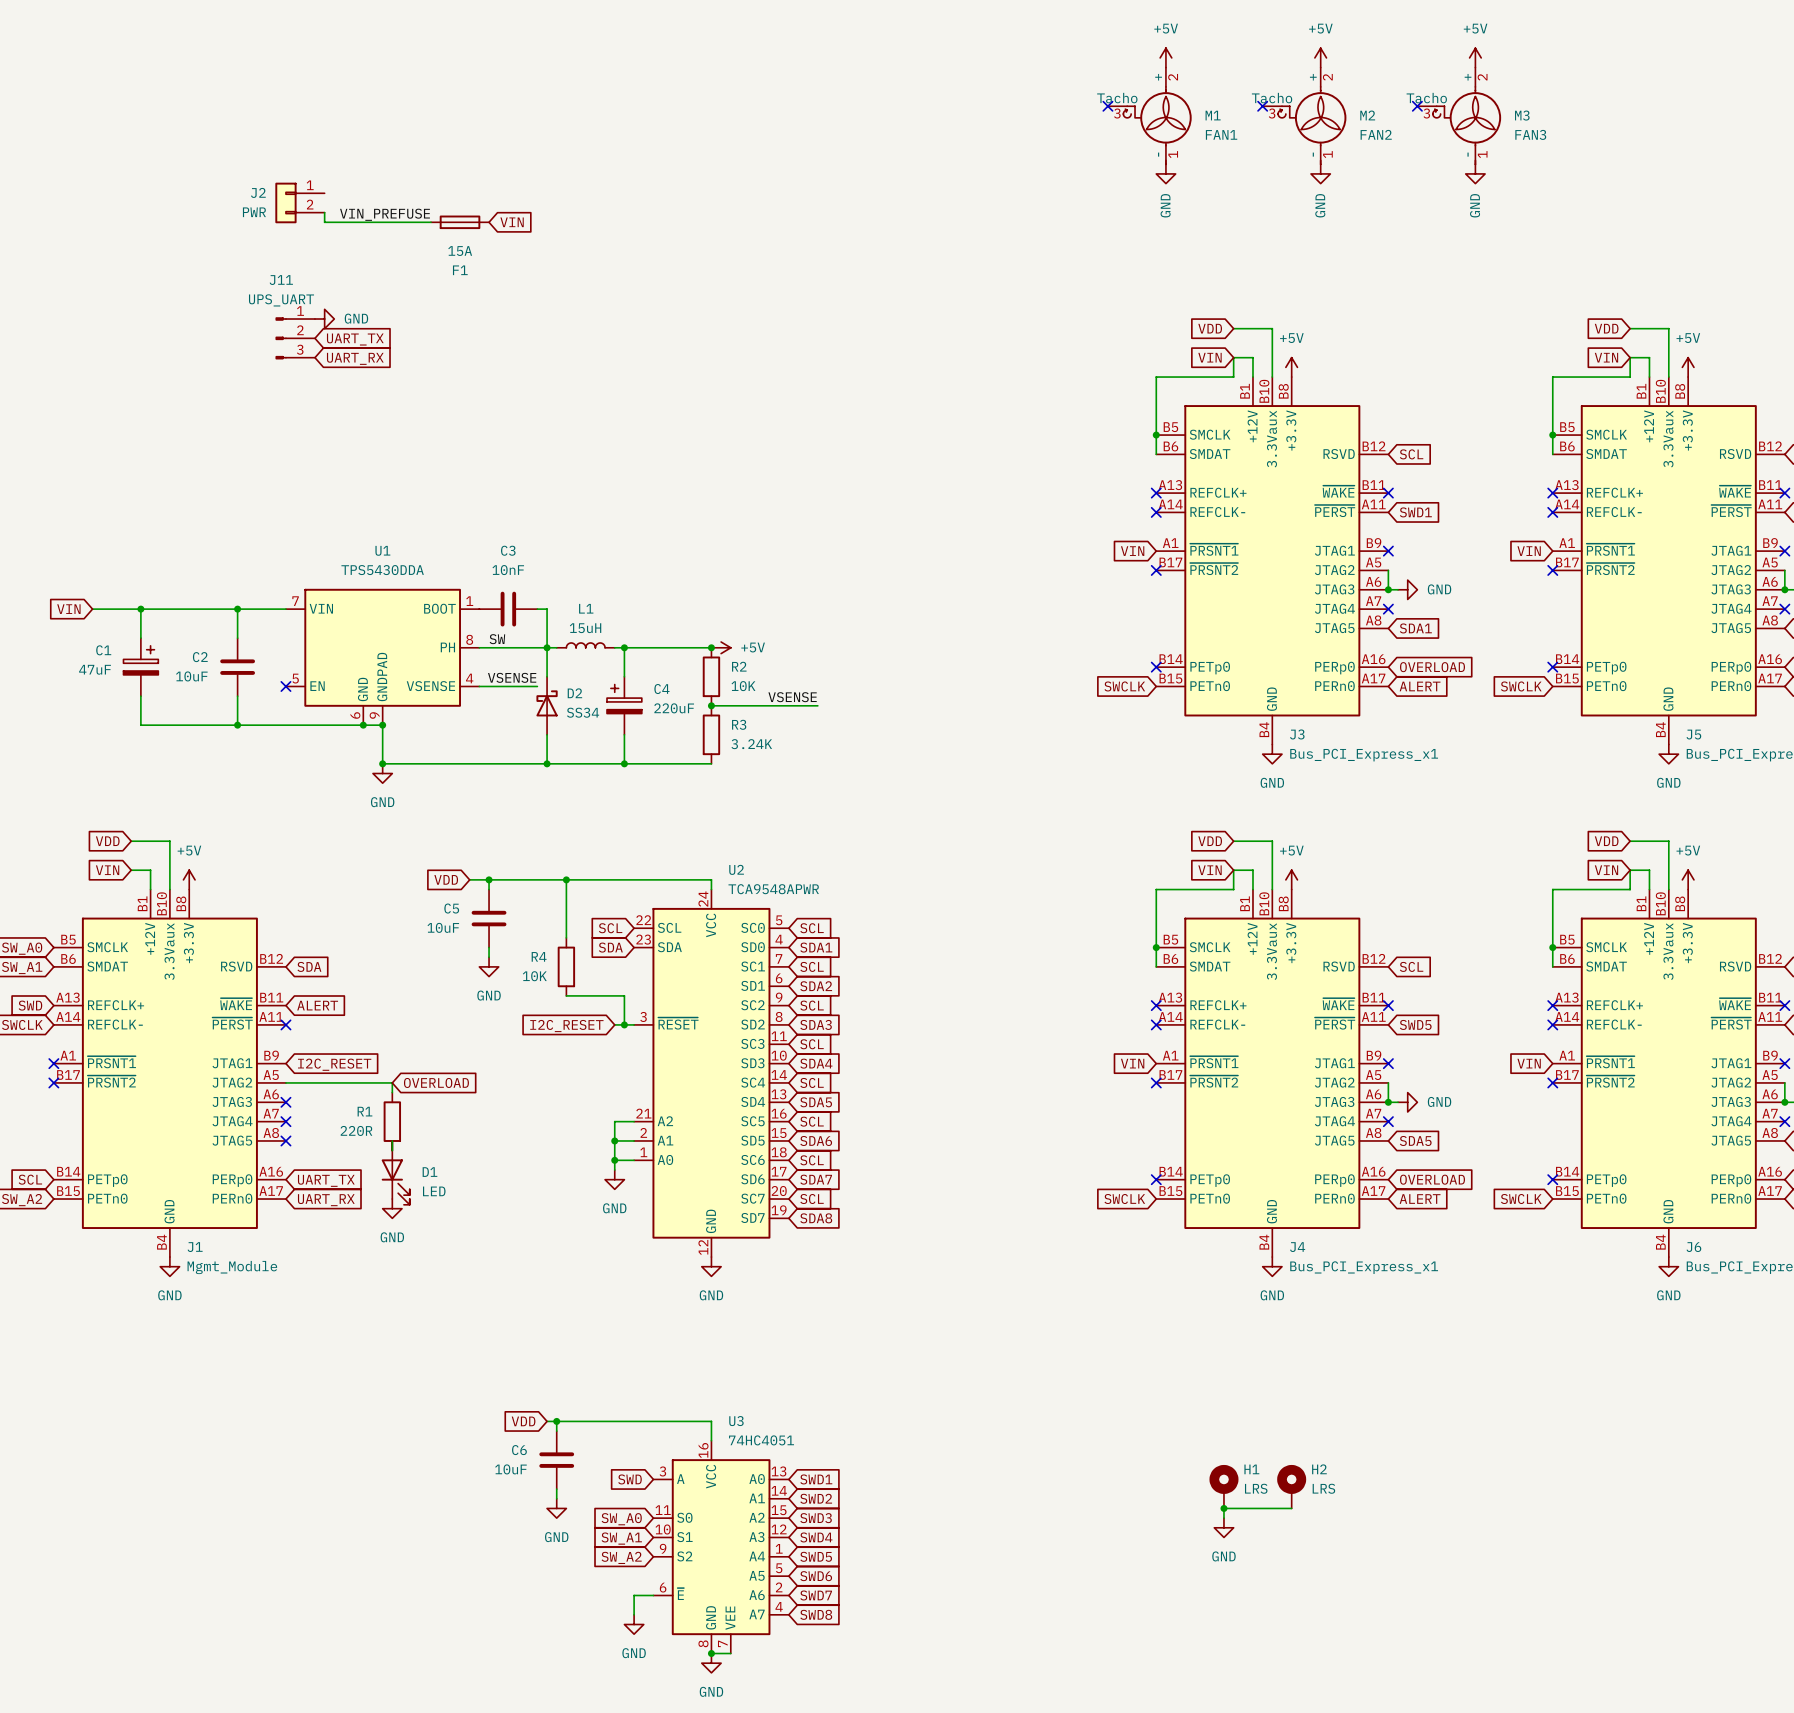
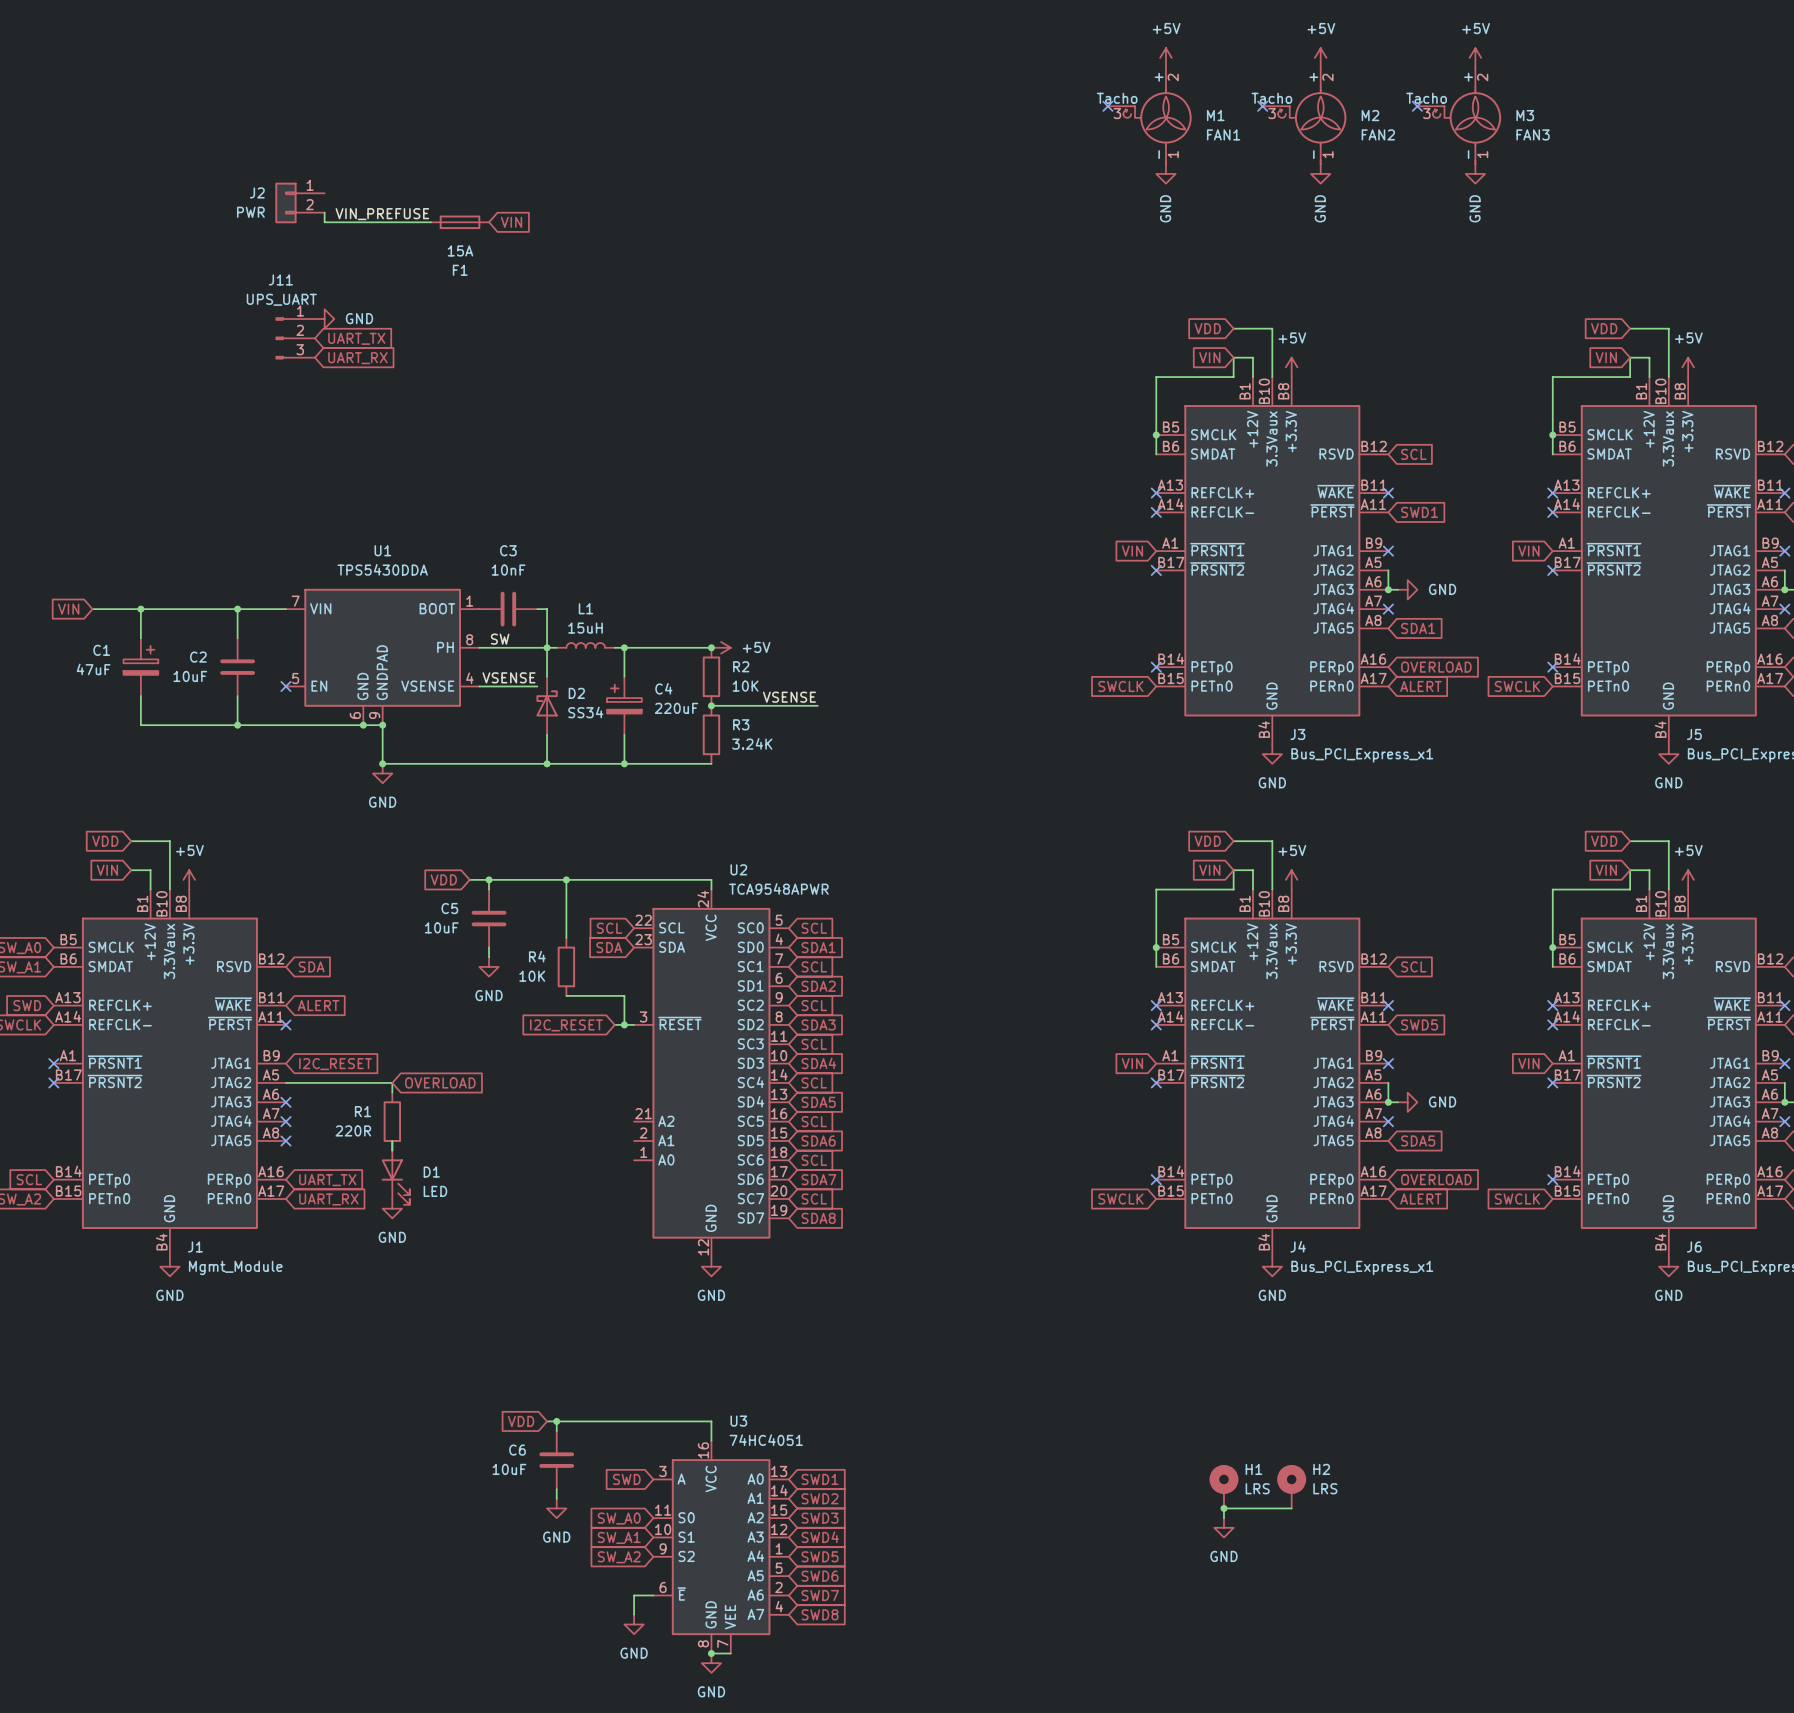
wire: (634, 1121) (614, 1121) (614, 1169) -> none
wire: (614, 1140) (634, 1140) -> none
junction: (614, 1140) -> none
wire: (614, 1160) (634, 1160) -> none
junction: (614, 1160) -> none
power symbol: GND (614, 1179) -> none

